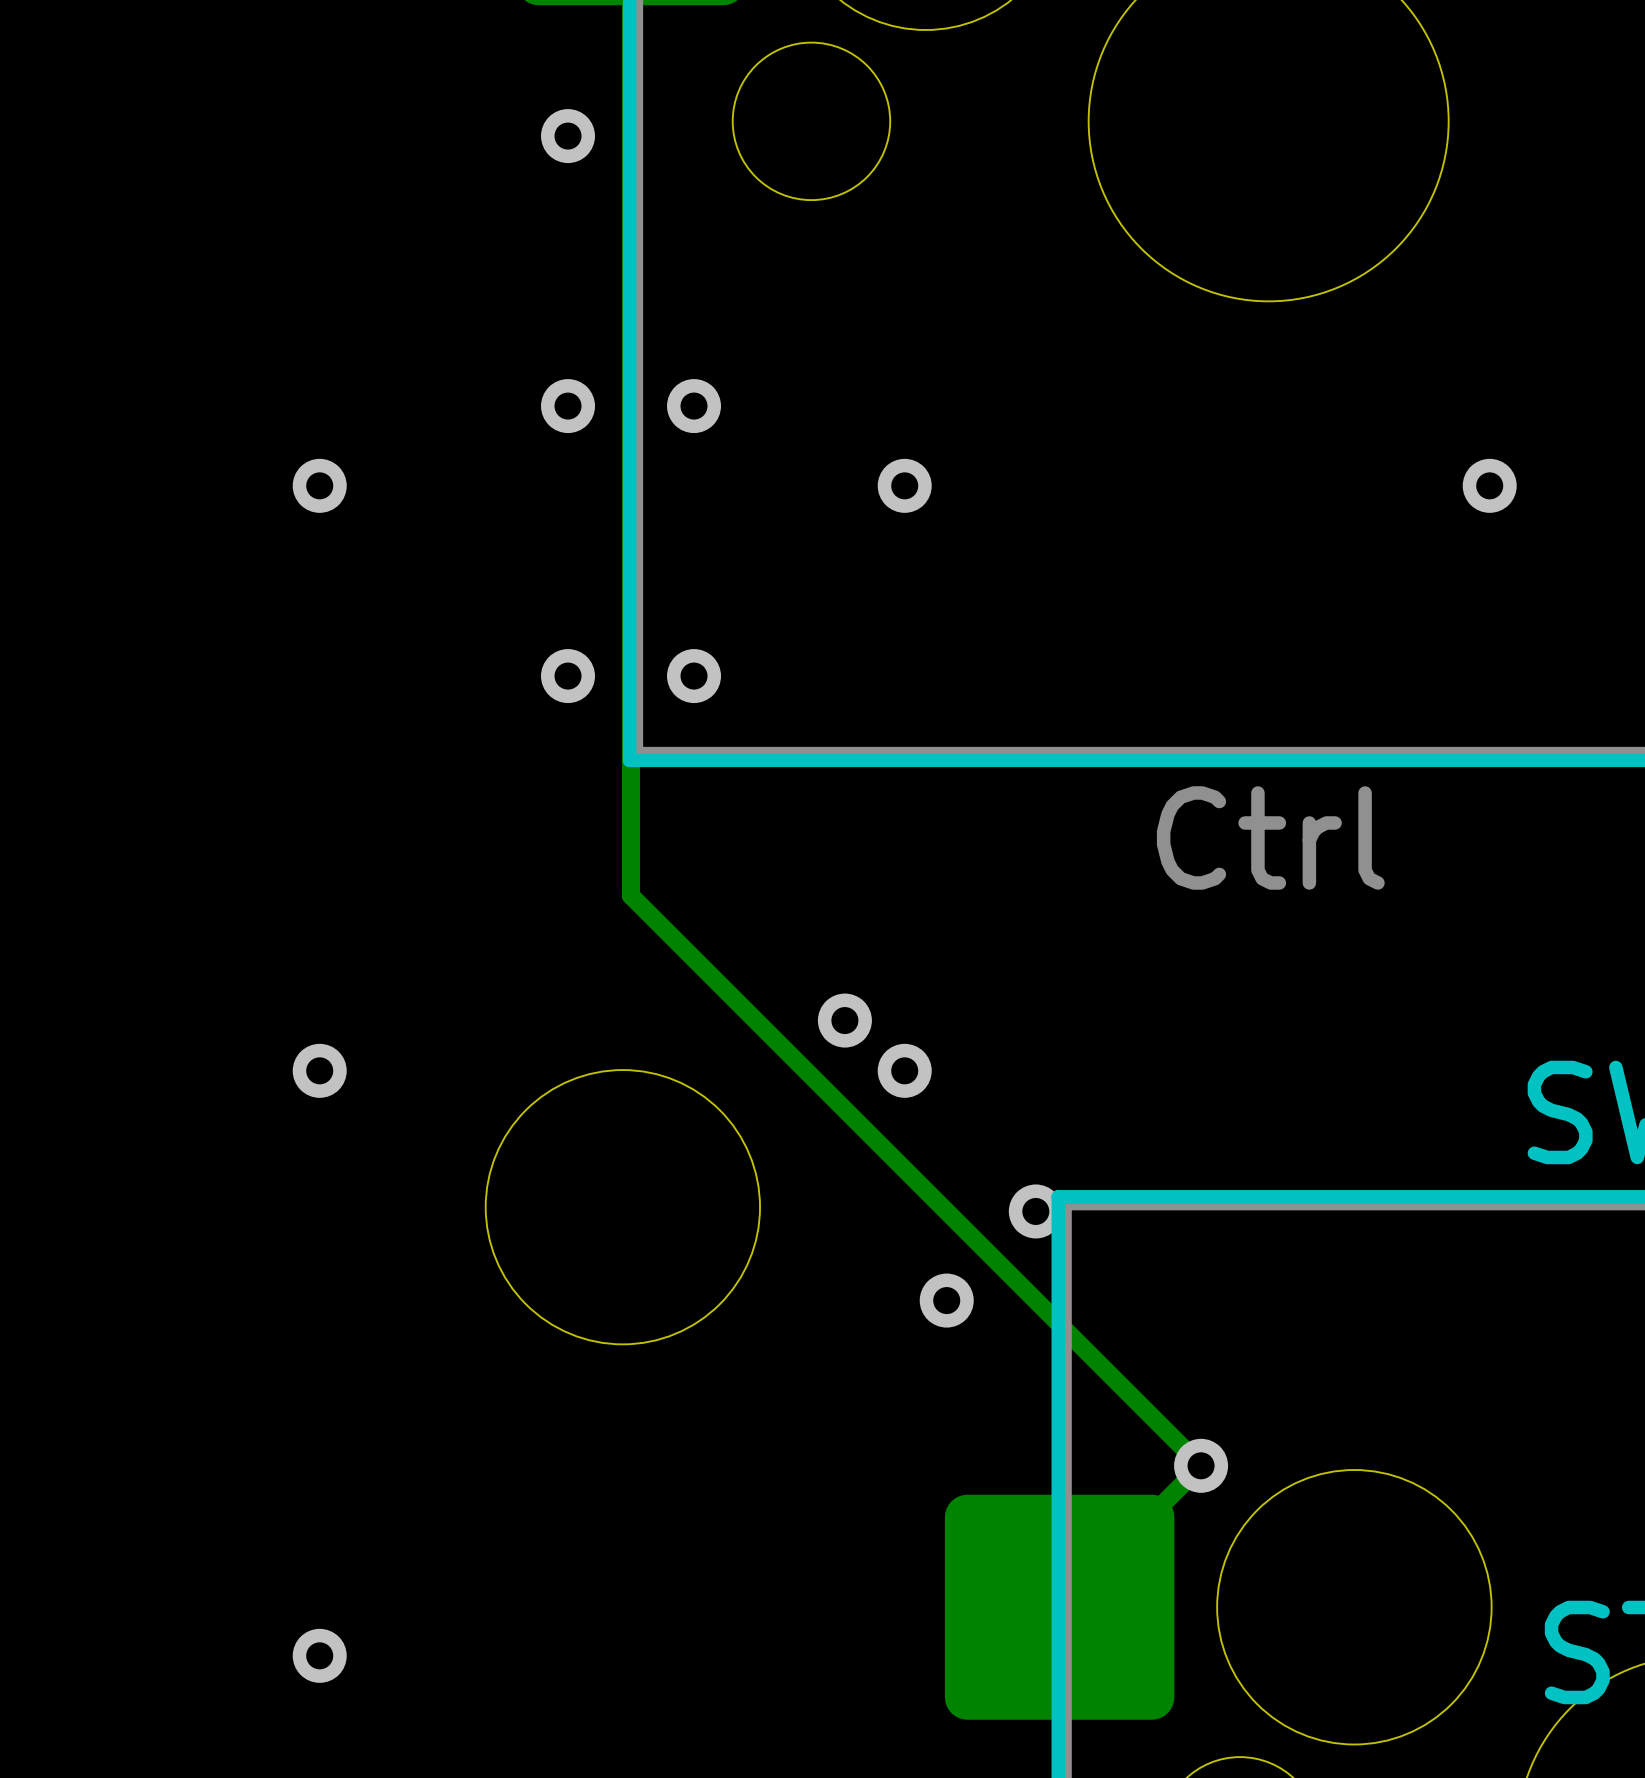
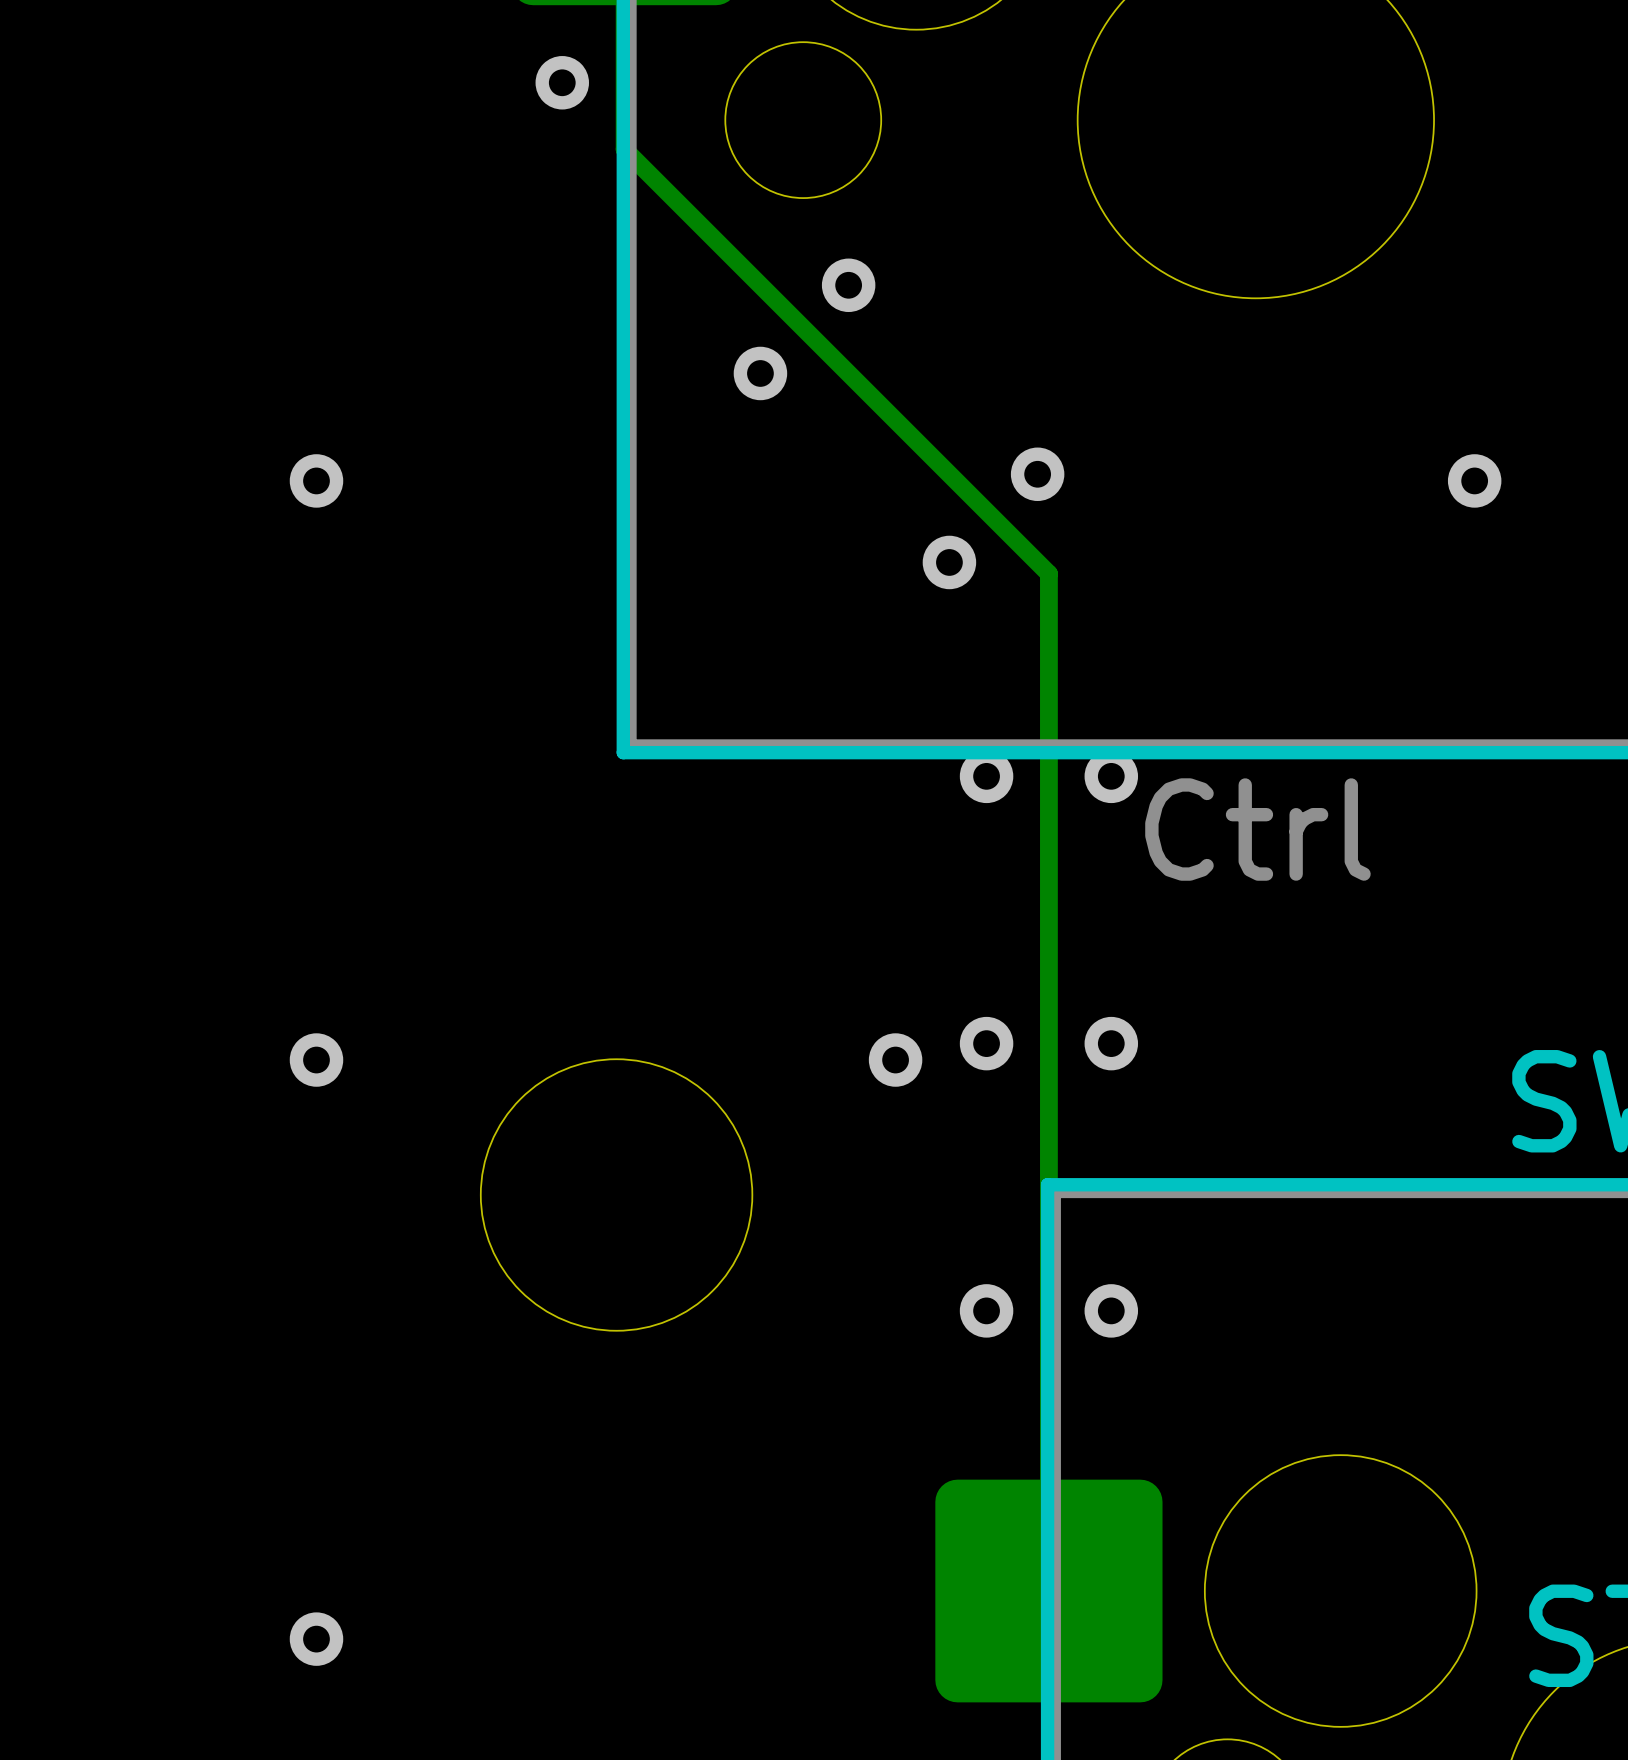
via position: (568, 136) -> (562, 82)
bottom track: (631, 150) (631, 895) (1201, 1465) (1059, 1607) -> (624, 149) (1048, 573) (1048, 1591)
via: none -> (848, 285)
via: (568, 406) -> none
via position: (694, 406) -> (760, 373)
via: none -> (1037, 474)
via: (904, 485) -> none
via: none -> (949, 562)
via: (568, 676) -> none
via: (694, 676) -> none
via: none -> (986, 776)
via: none -> (1111, 776)
via: (844, 1020) -> none
via: none -> (986, 1043)
via: none -> (1111, 1043)
via: (1035, 1211) -> none
via position: (946, 1300) -> (986, 1310)
via: none -> (1111, 1310)
via: (1201, 1465) -> none

